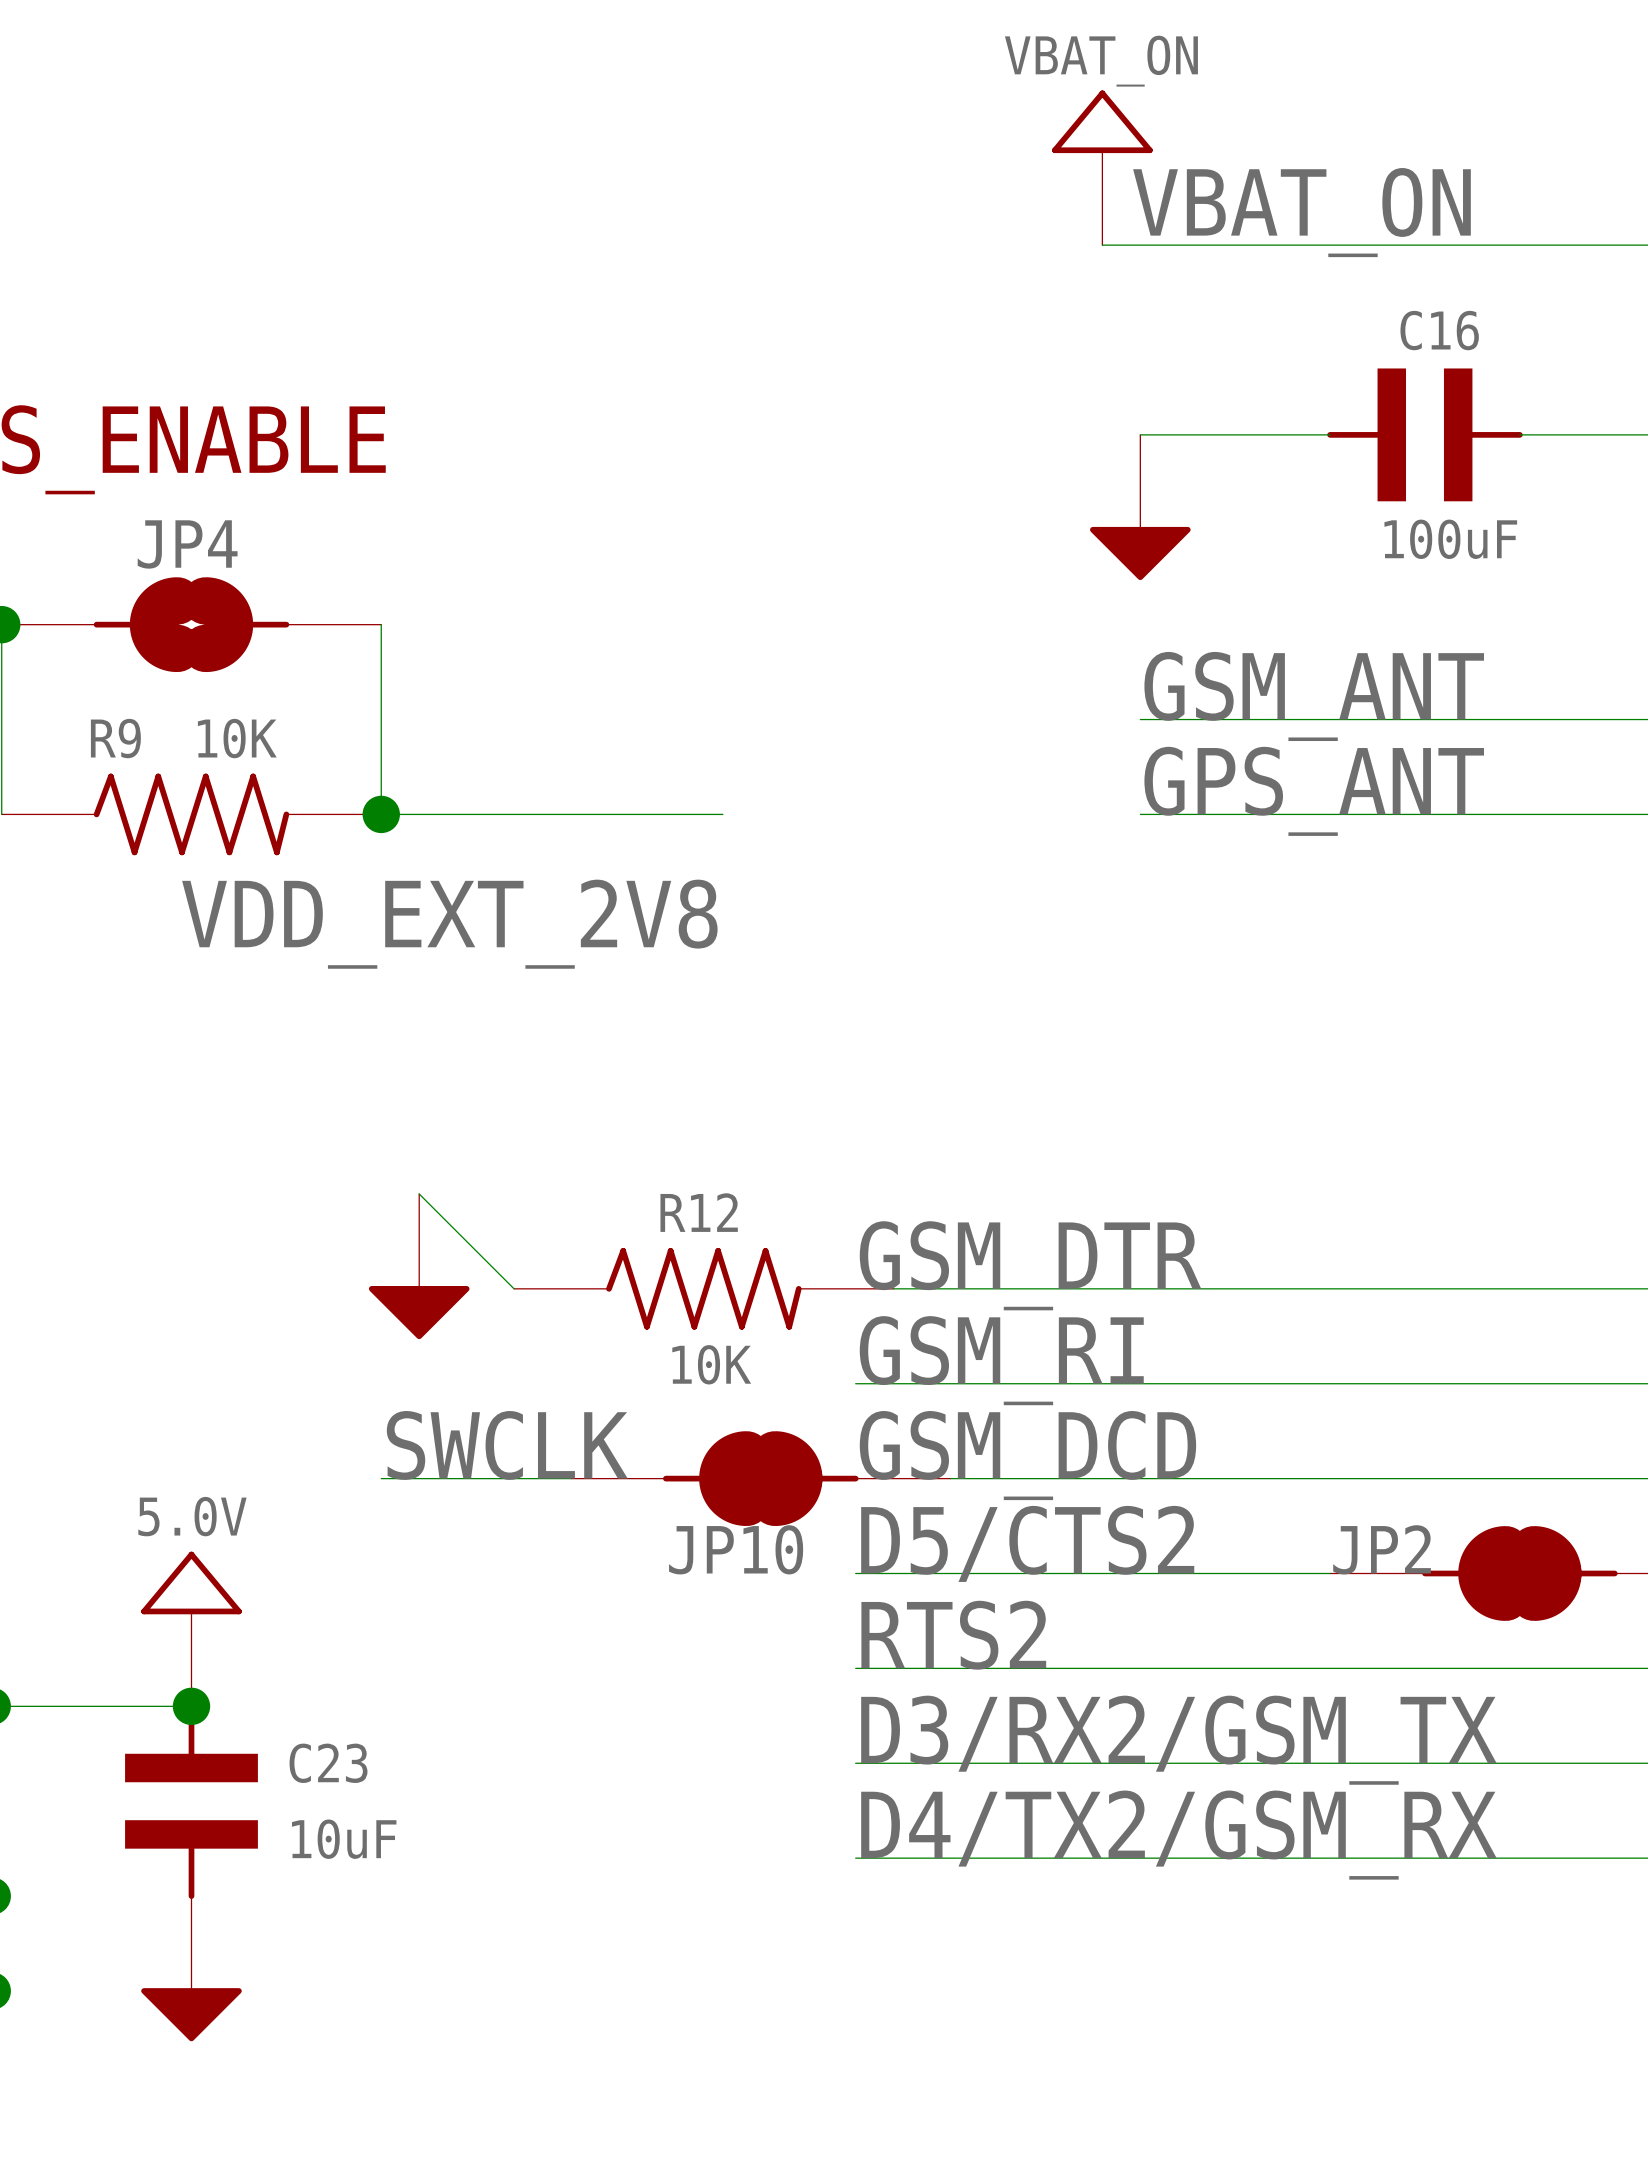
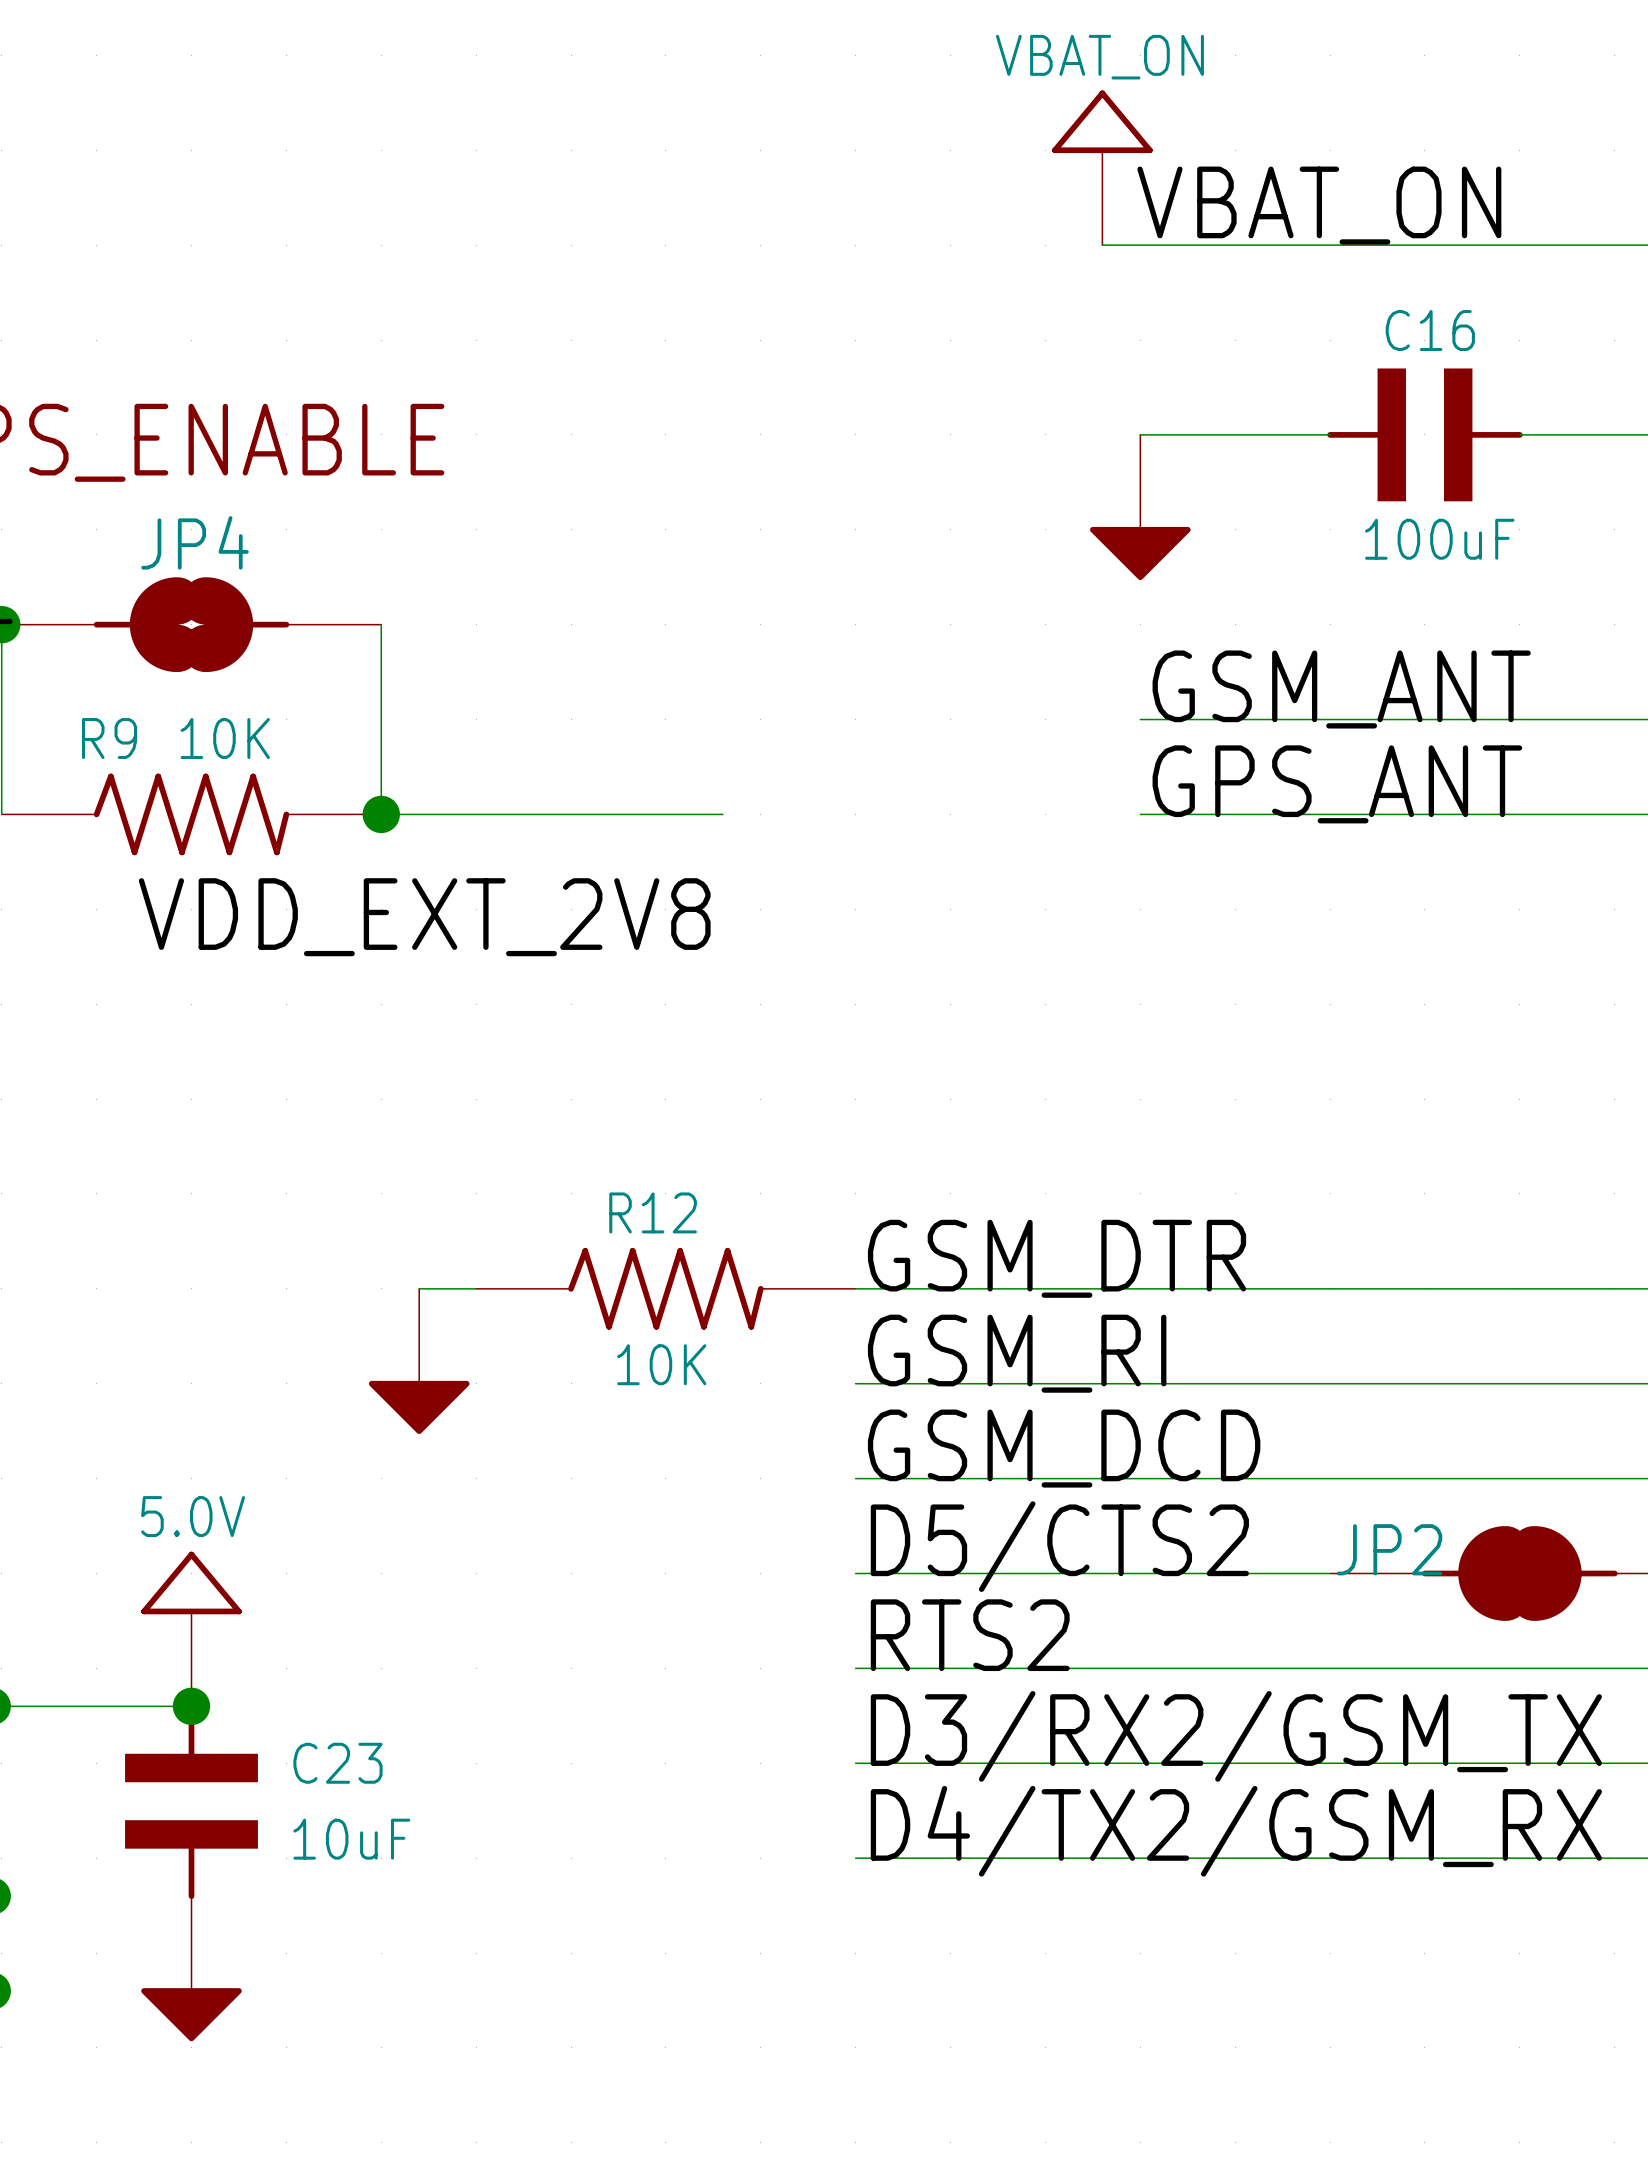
wire: (419, 1193) (514, 1288) -> none
power symbol position: (419, 1266) -> (419, 1361)
R12 position: (703, 1288) -> (665, 1288)
label: SWCLK (507, 1445) -> none
wire: (381, 1478) (571, 1478) -> none
JP10: (760, 1478) -> none

